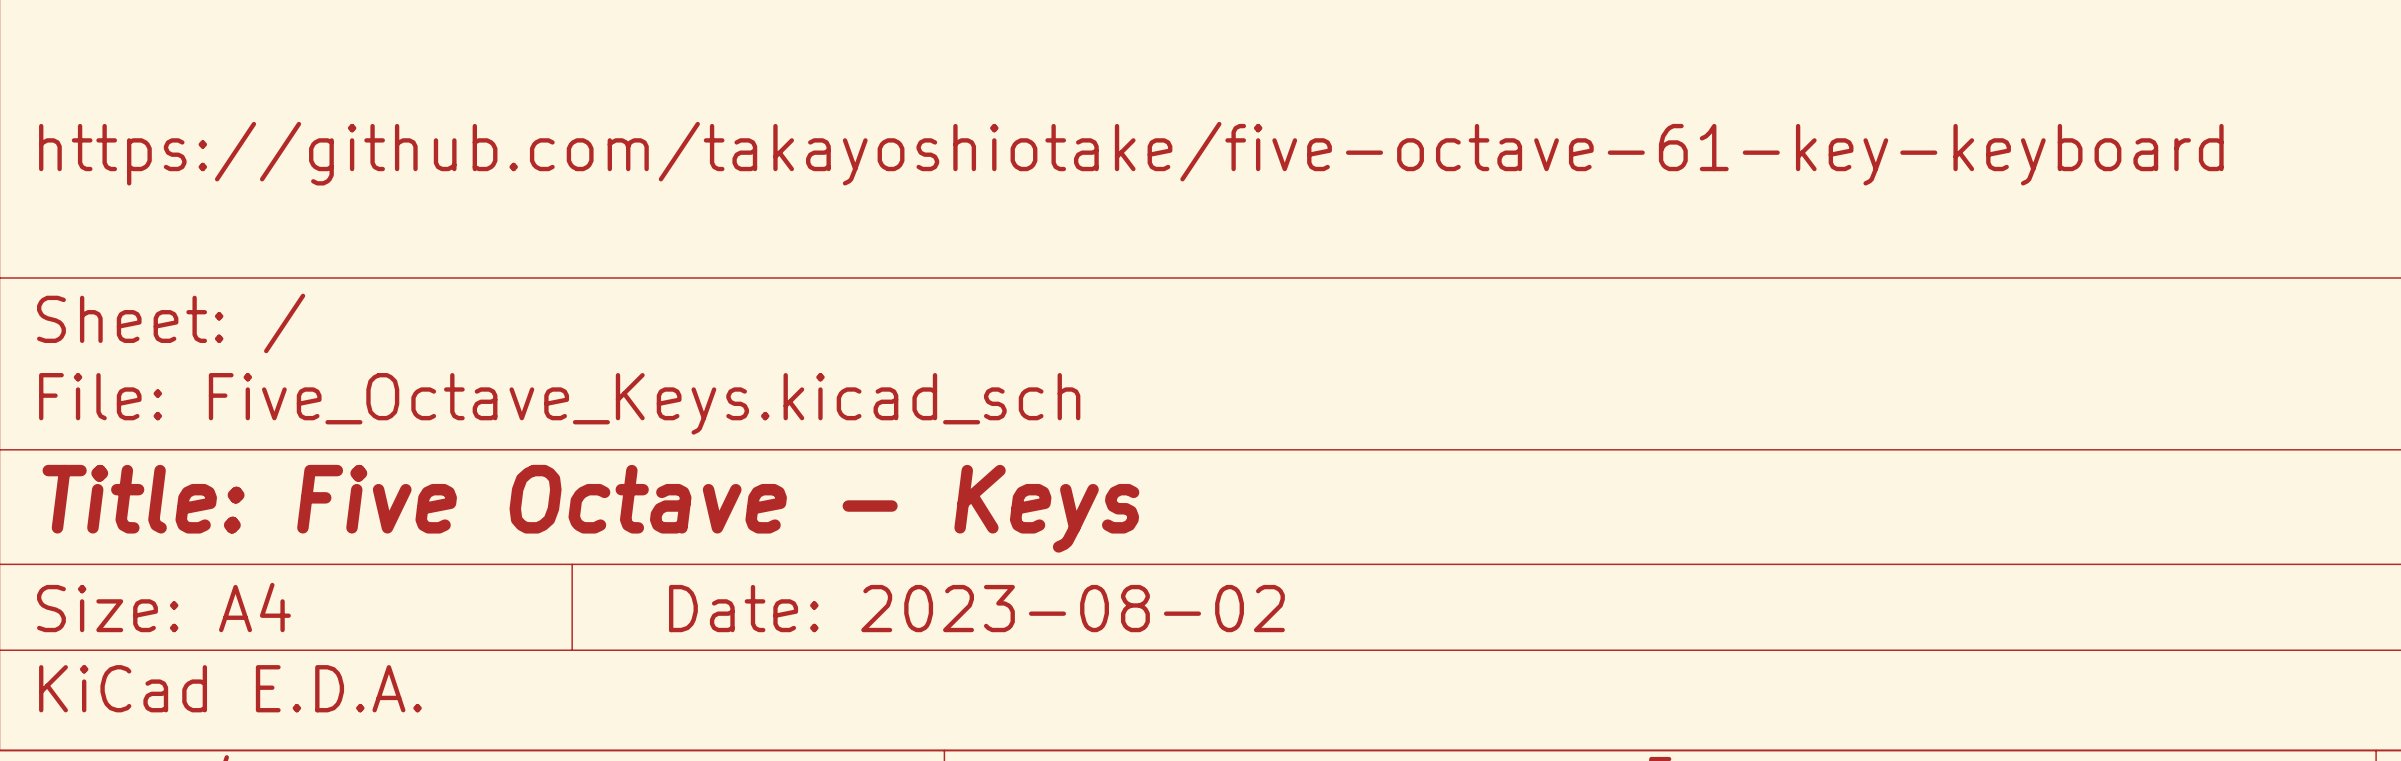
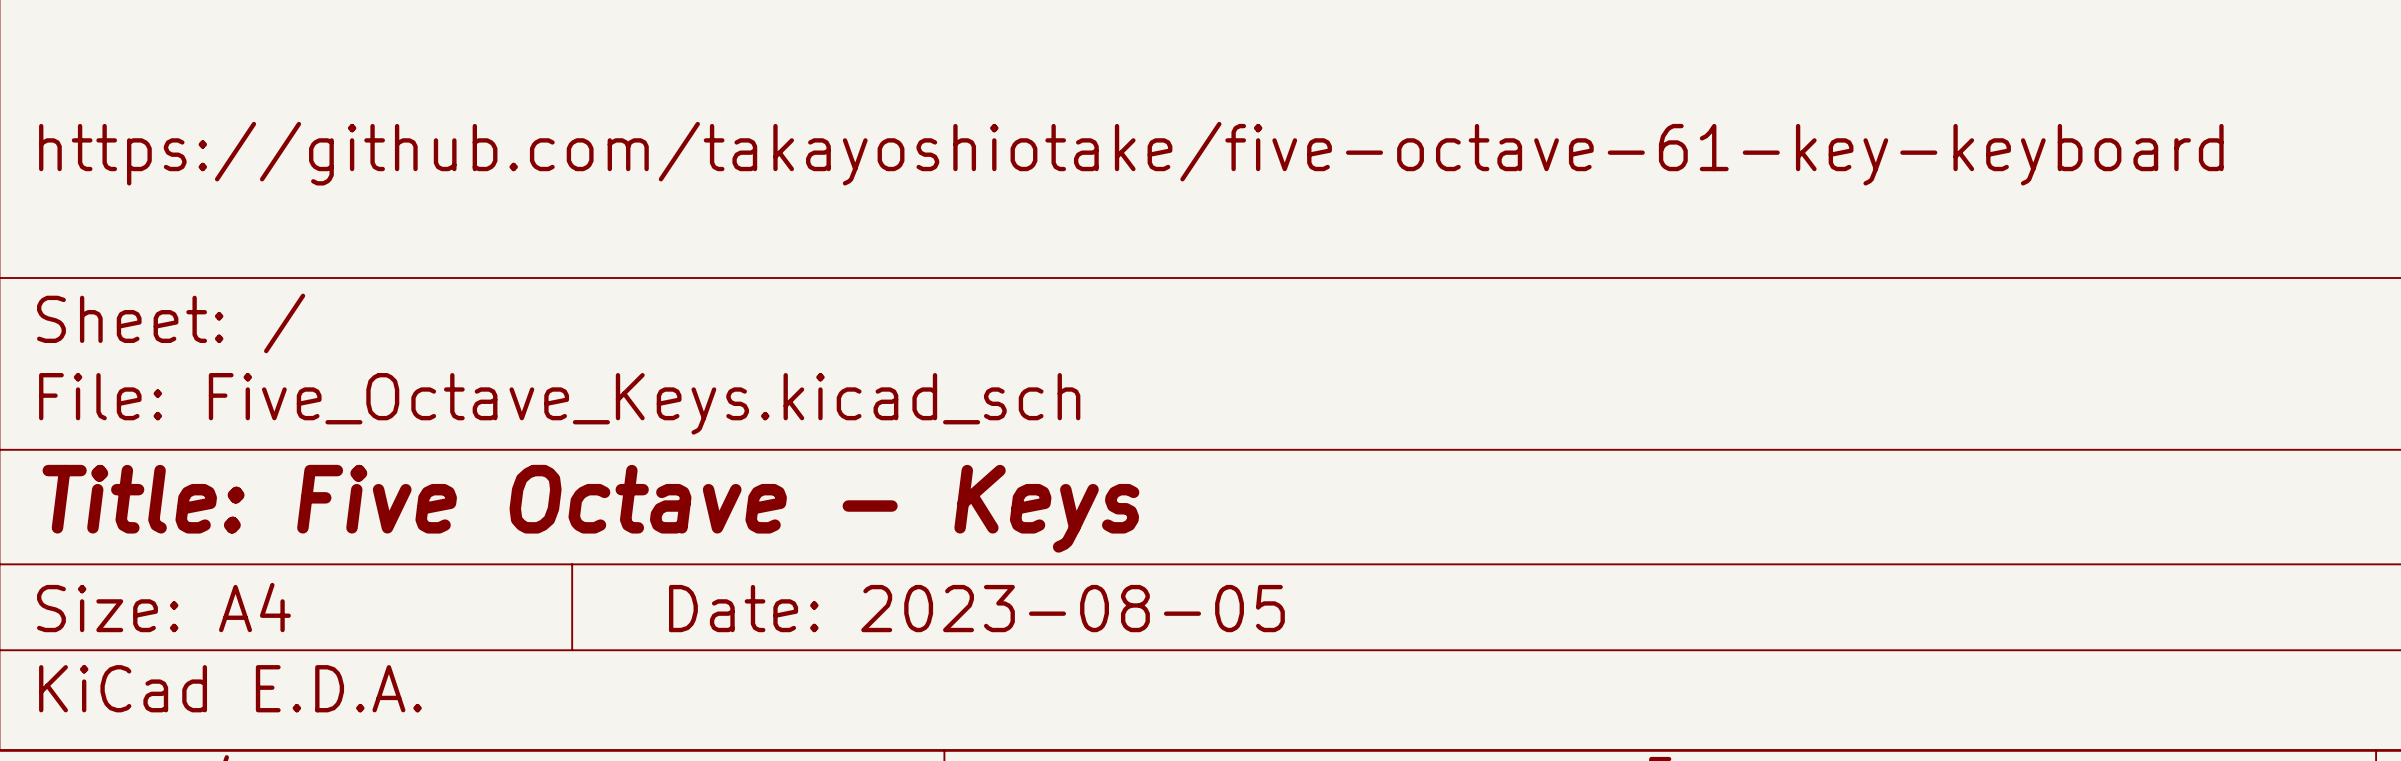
title block: Date: 2023-08-02 (976, 608) -> Date: 2023-08-05 (976, 608)

